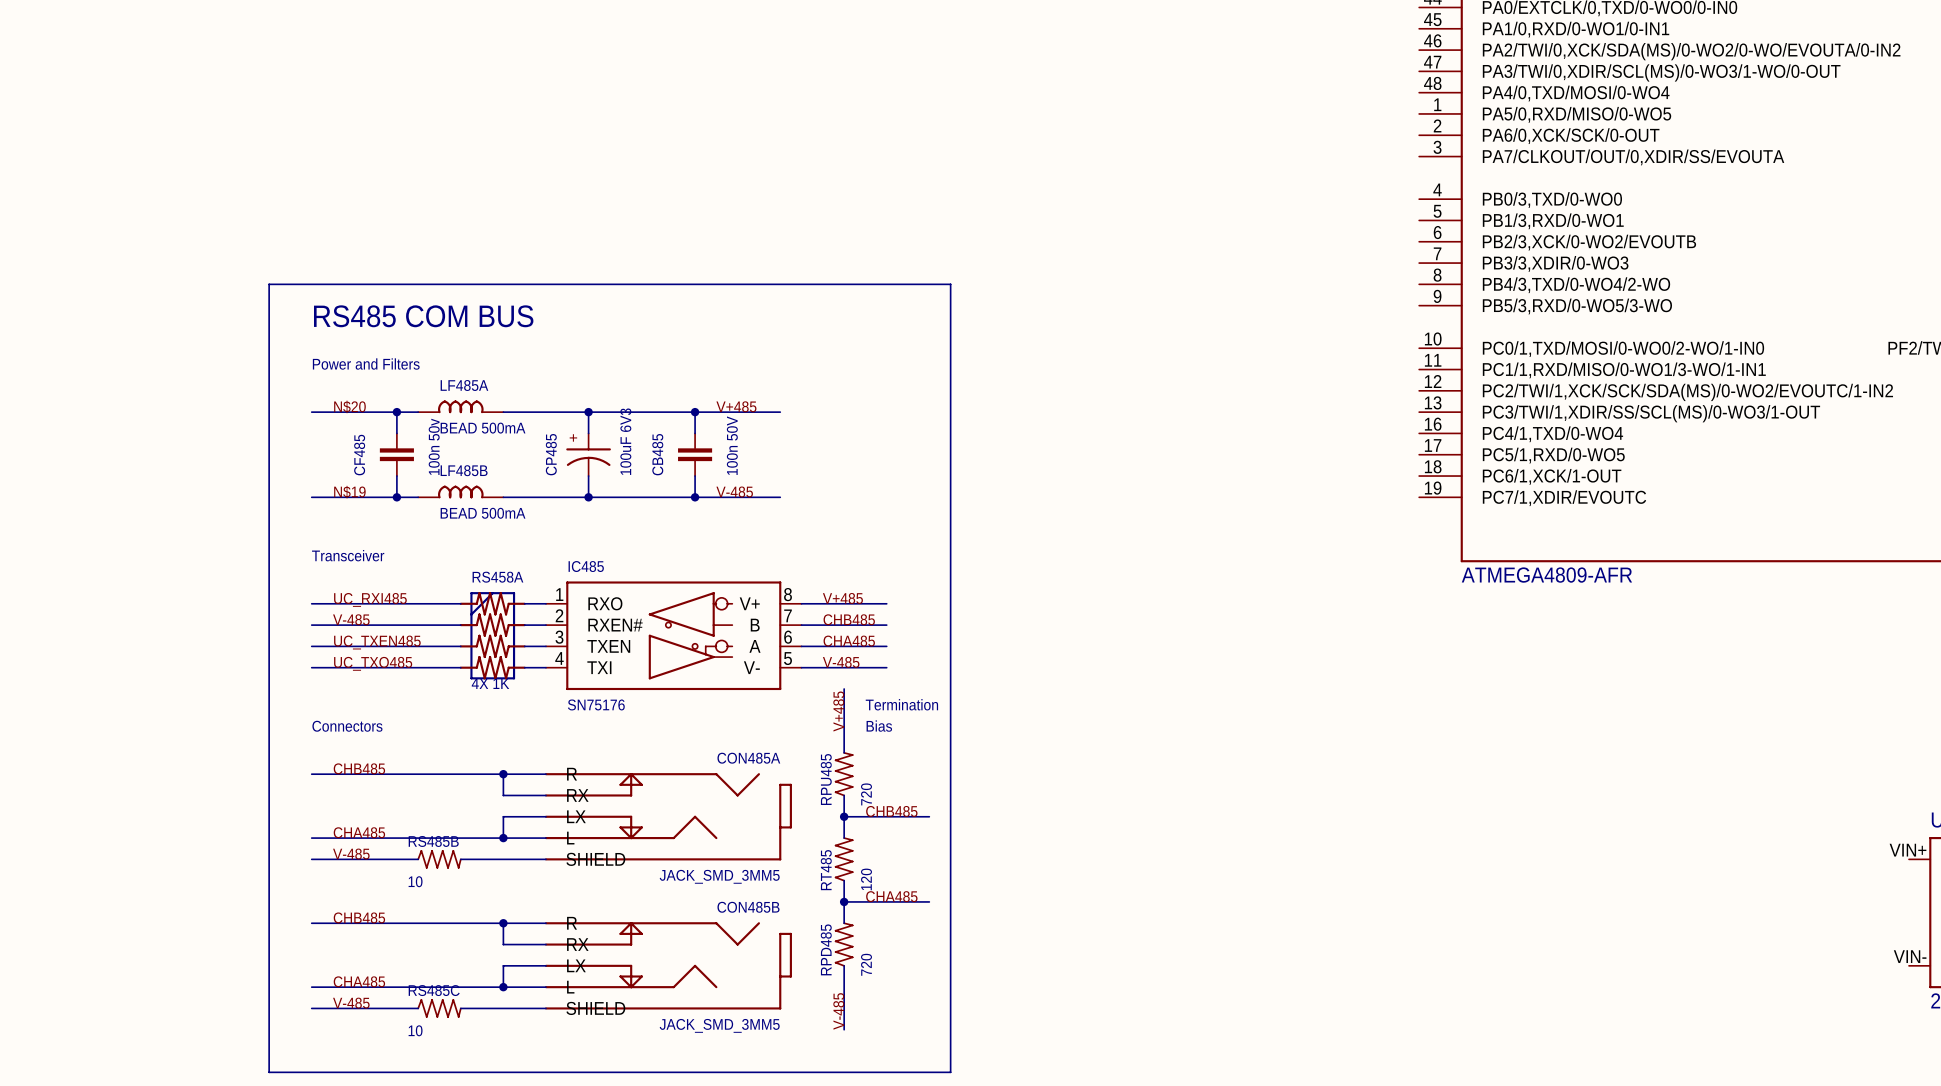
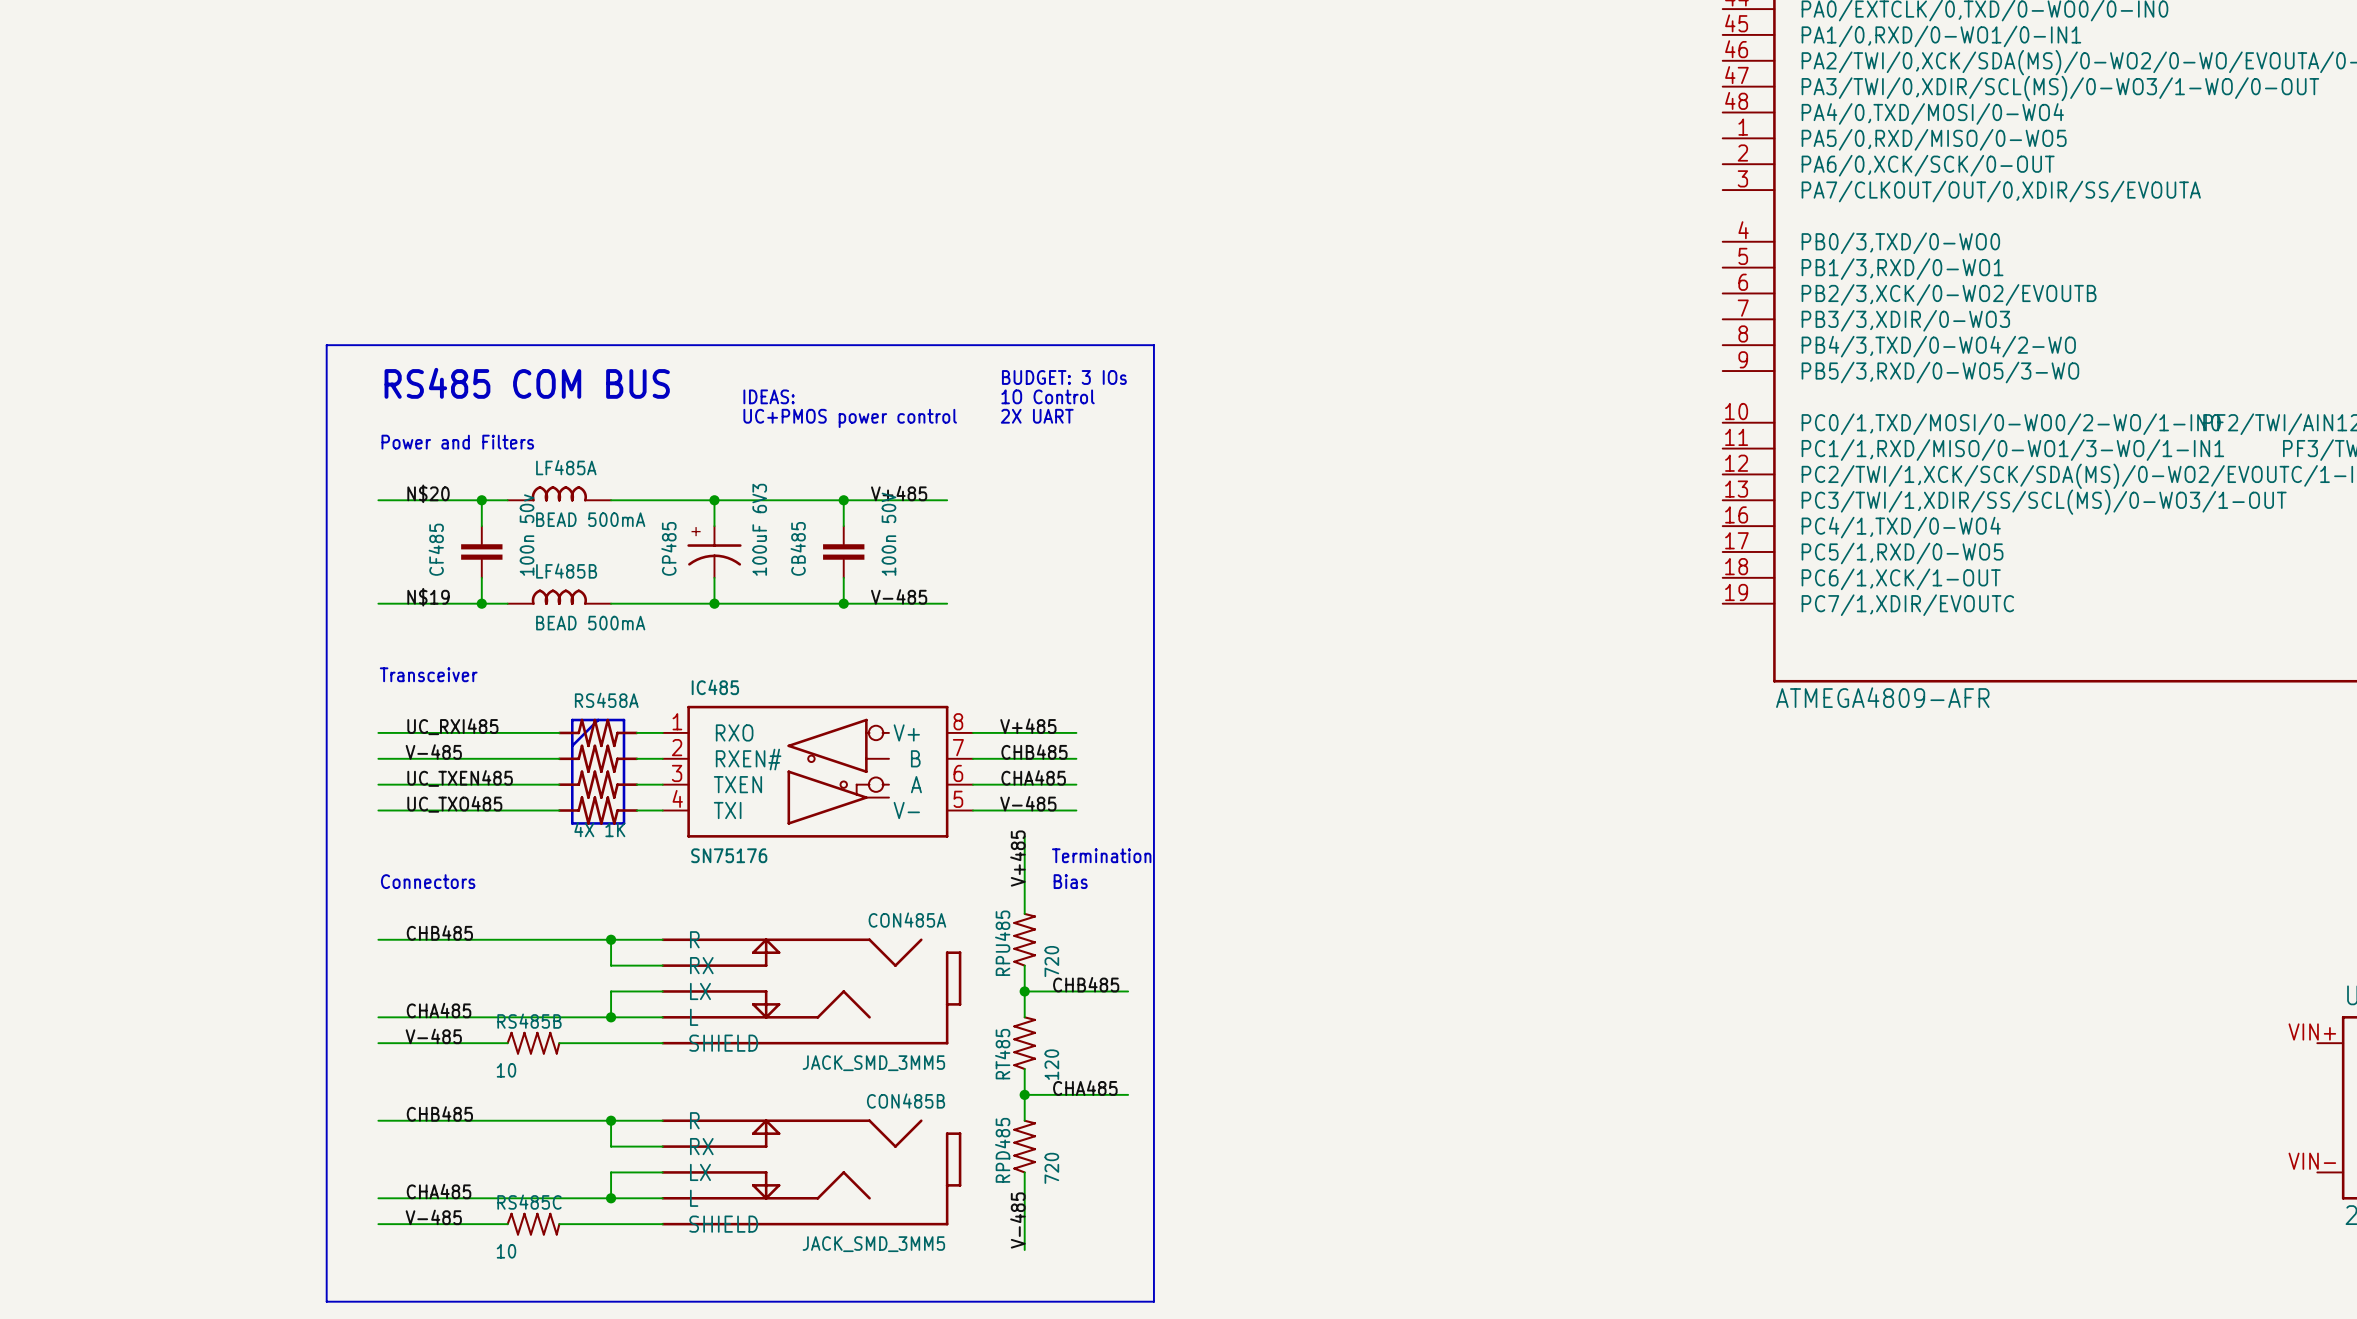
text: none -> BUDGET: 3 IOs (1064, 377)
text: none -> IDEAS: (769, 396)
text: none -> 1O Control (1048, 396)
text: none -> 2X UART (1037, 416)
text: none -> UC+PMOS power control (850, 418)

